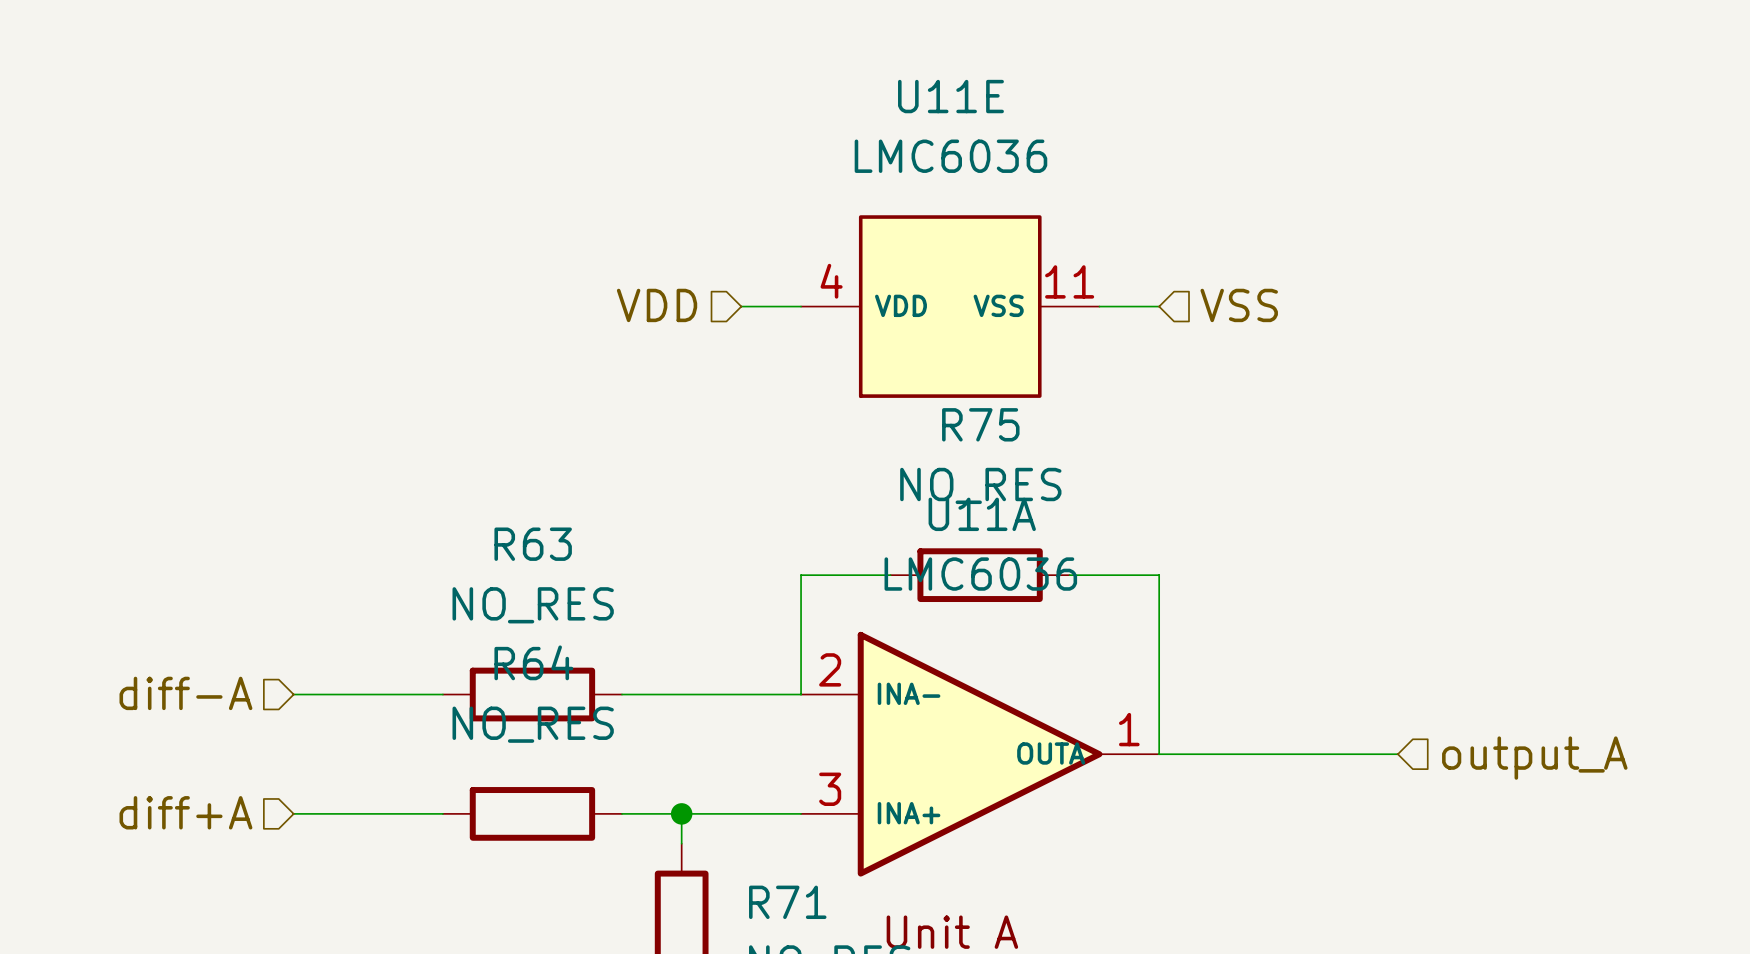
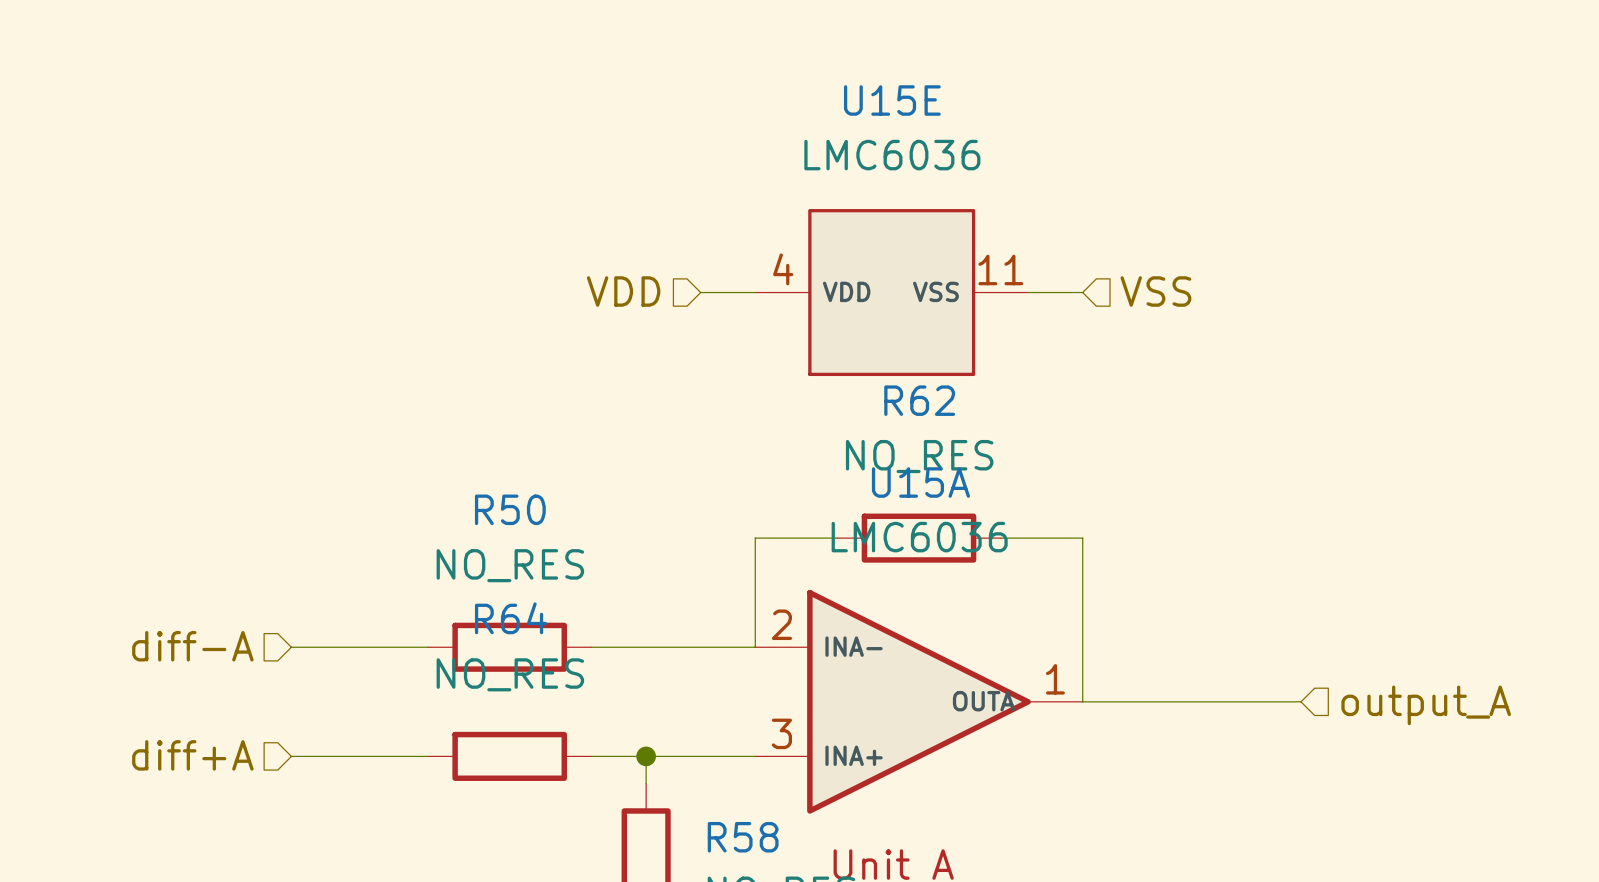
U11E name: U11E (950, 96) -> U15E (892, 100)
R75 name: R75 (980, 424) -> R62 (919, 400)
U11A name: U11A (982, 514) -> U15A (920, 482)
R63 name: R63 (533, 544) -> R50 (510, 509)
R71 name: R71 (787, 902) -> R58 (743, 837)

